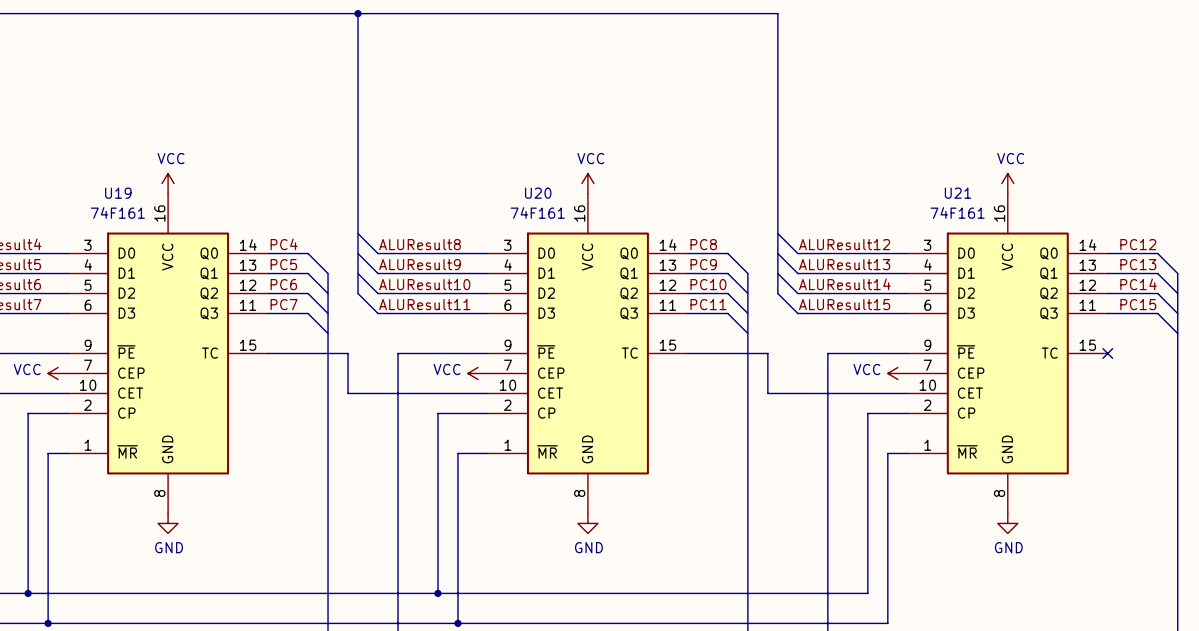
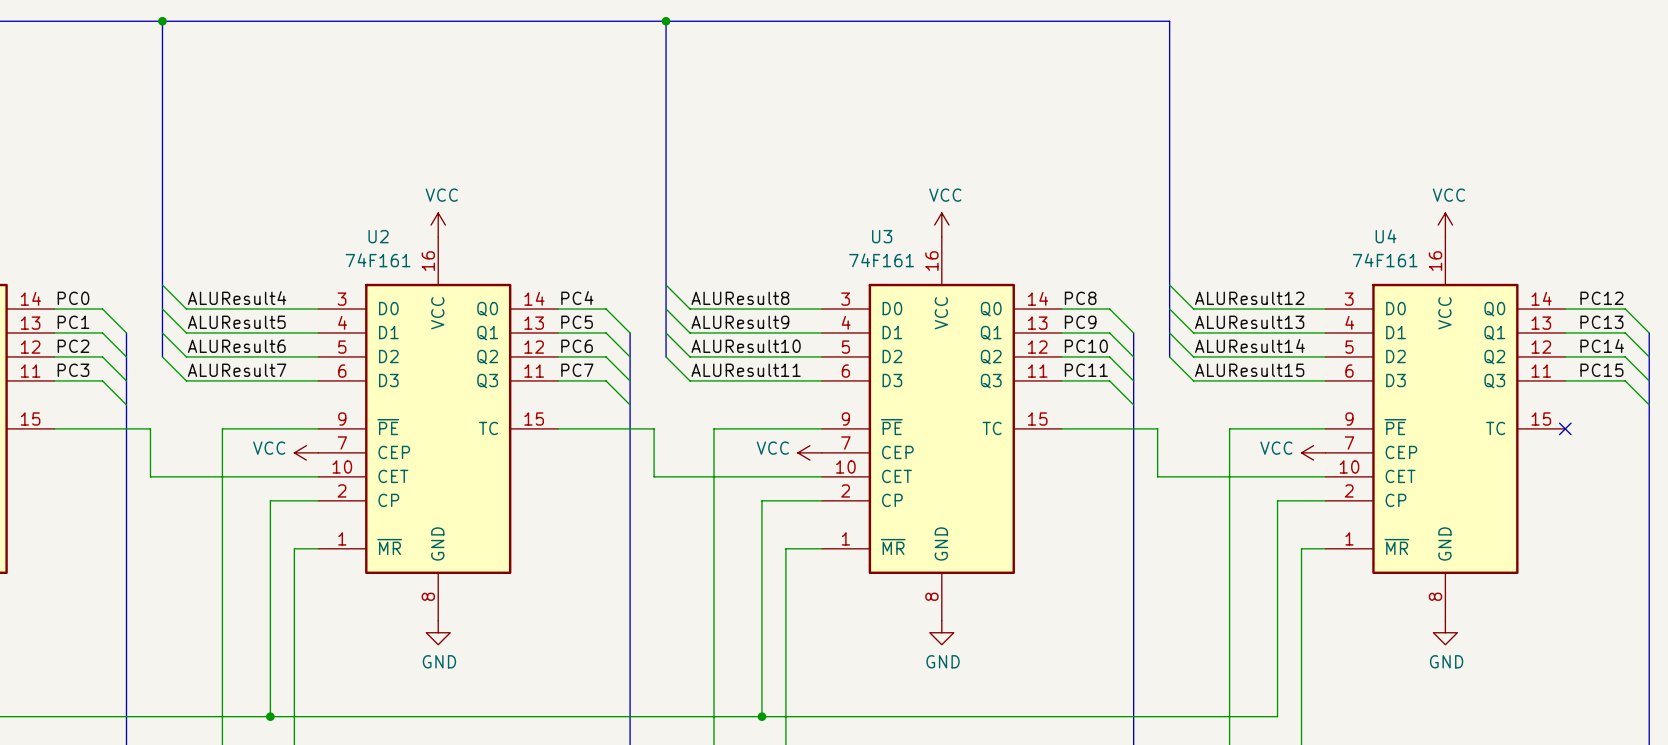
U19 name: U19 (118, 193) -> U2 (378, 236)
U20 name: U20 (538, 193) -> U3 (882, 236)
U21 name: U21 (958, 193) -> U4 (1386, 236)

